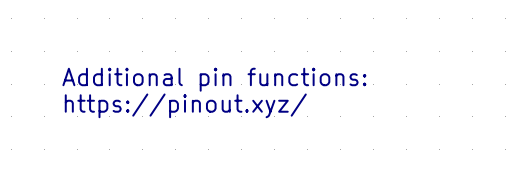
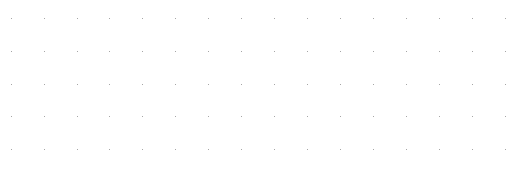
text: Additional pin functions: (214, 79) -> none
text: https://pinout.xyz/ (185, 105) -> none

